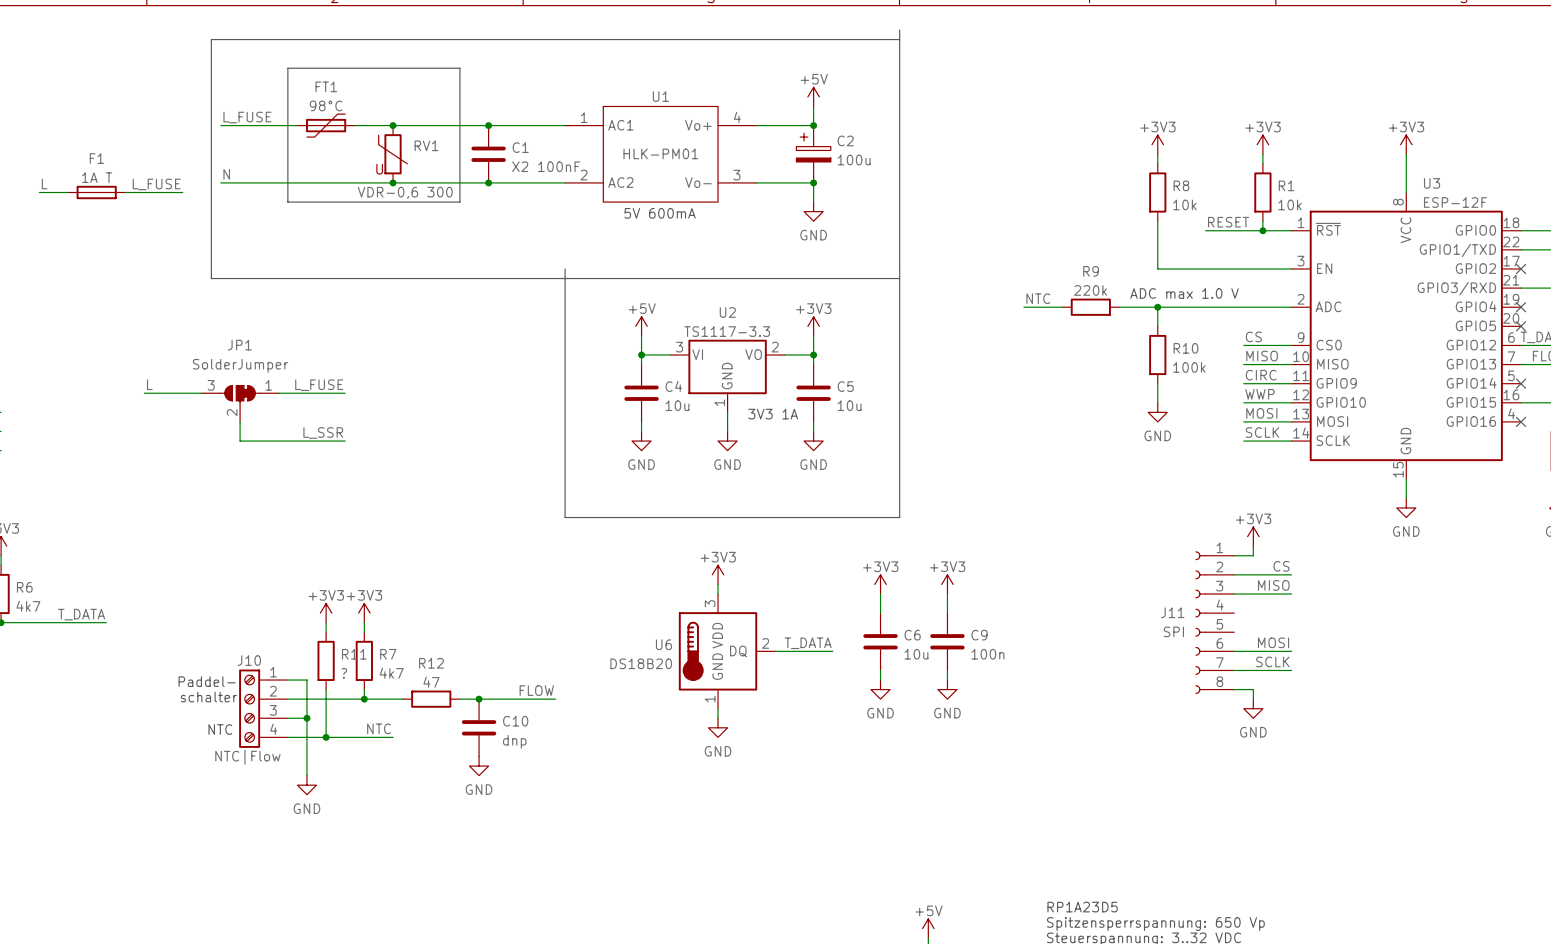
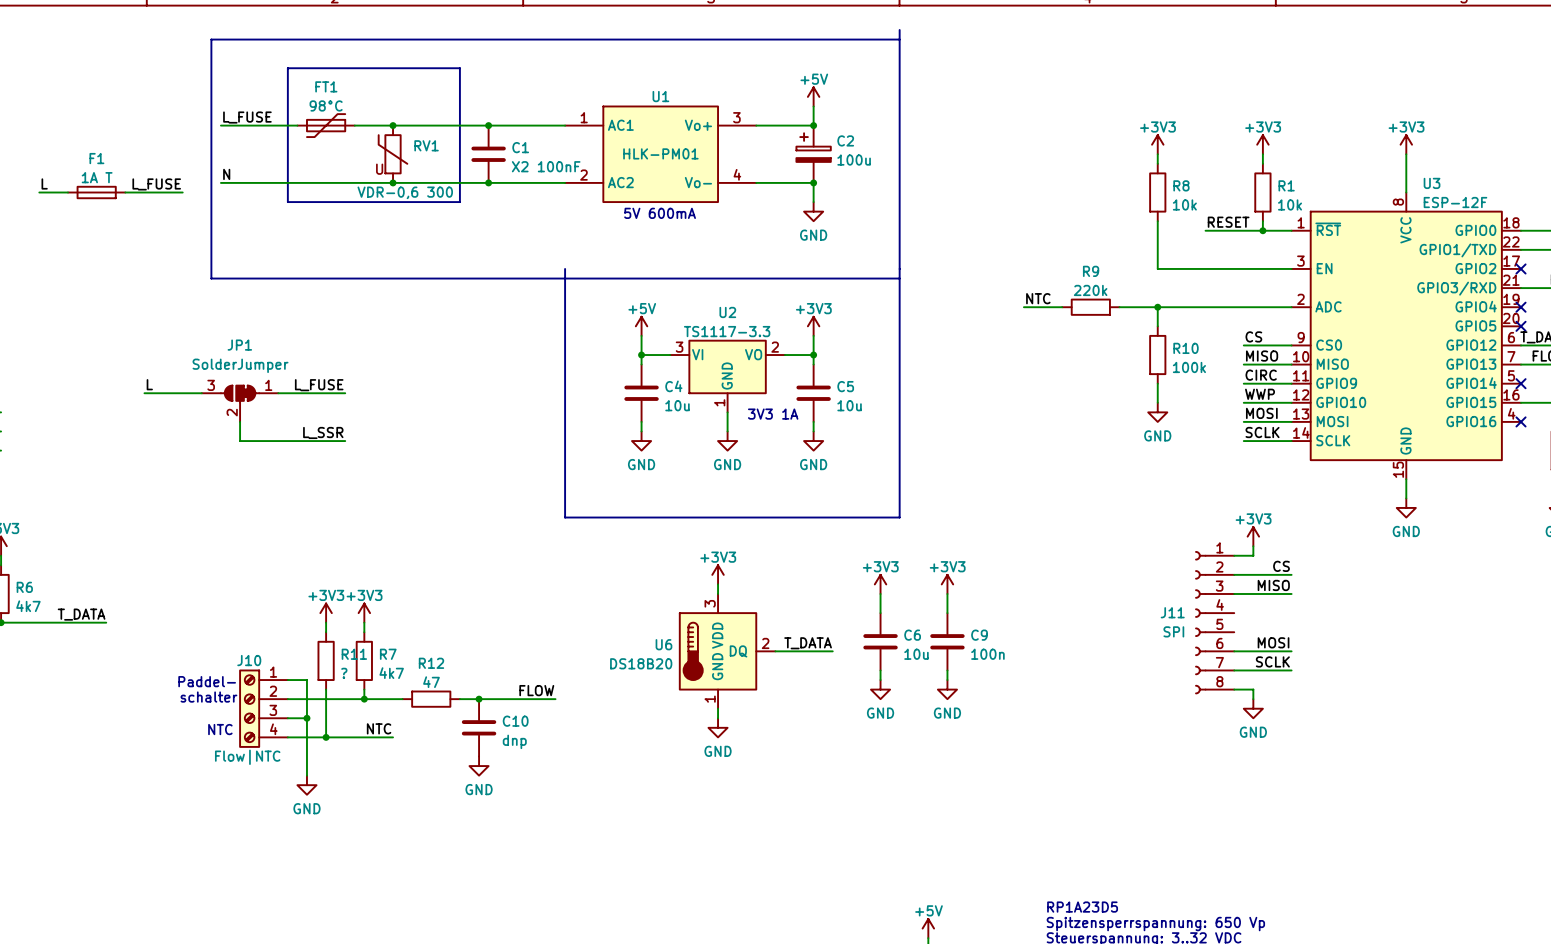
U1 pin number: 4 (737, 117) -> 3 (736, 117)
U1 pin number: 3 (736, 175) -> 4 (737, 174)
text: ADC max 1.0 V (1184, 293) -> none
J10 value: NTC|Flow (247, 757) -> Flow|NTC (247, 757)

